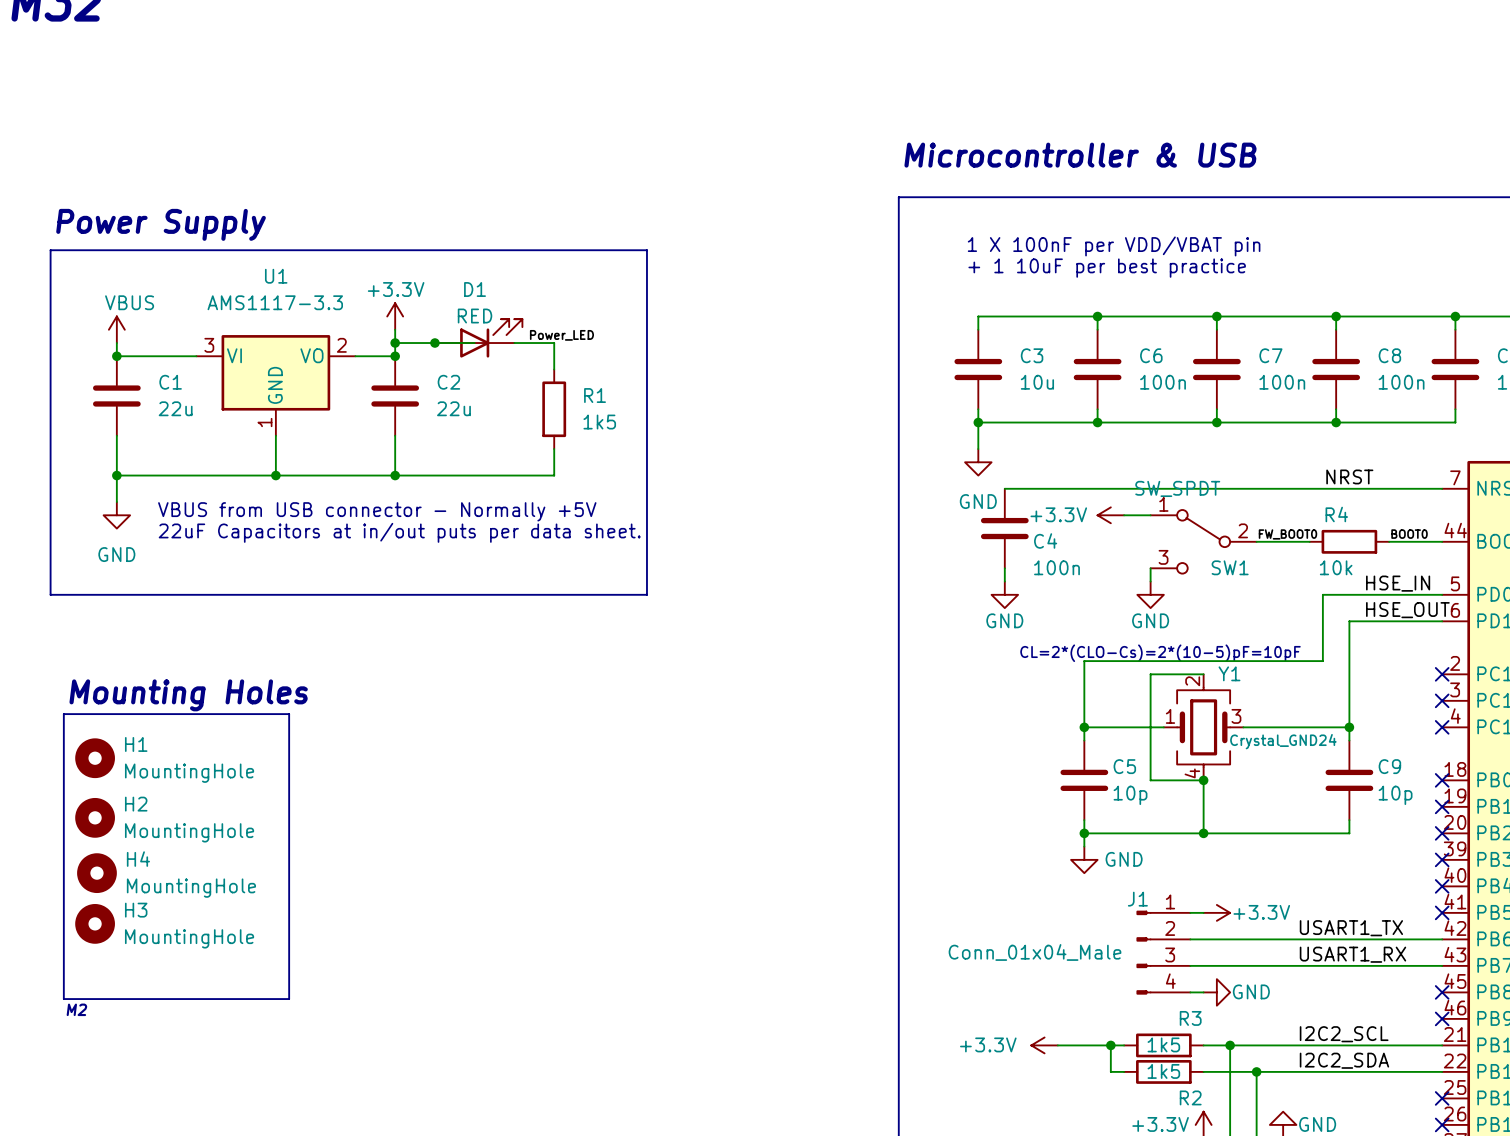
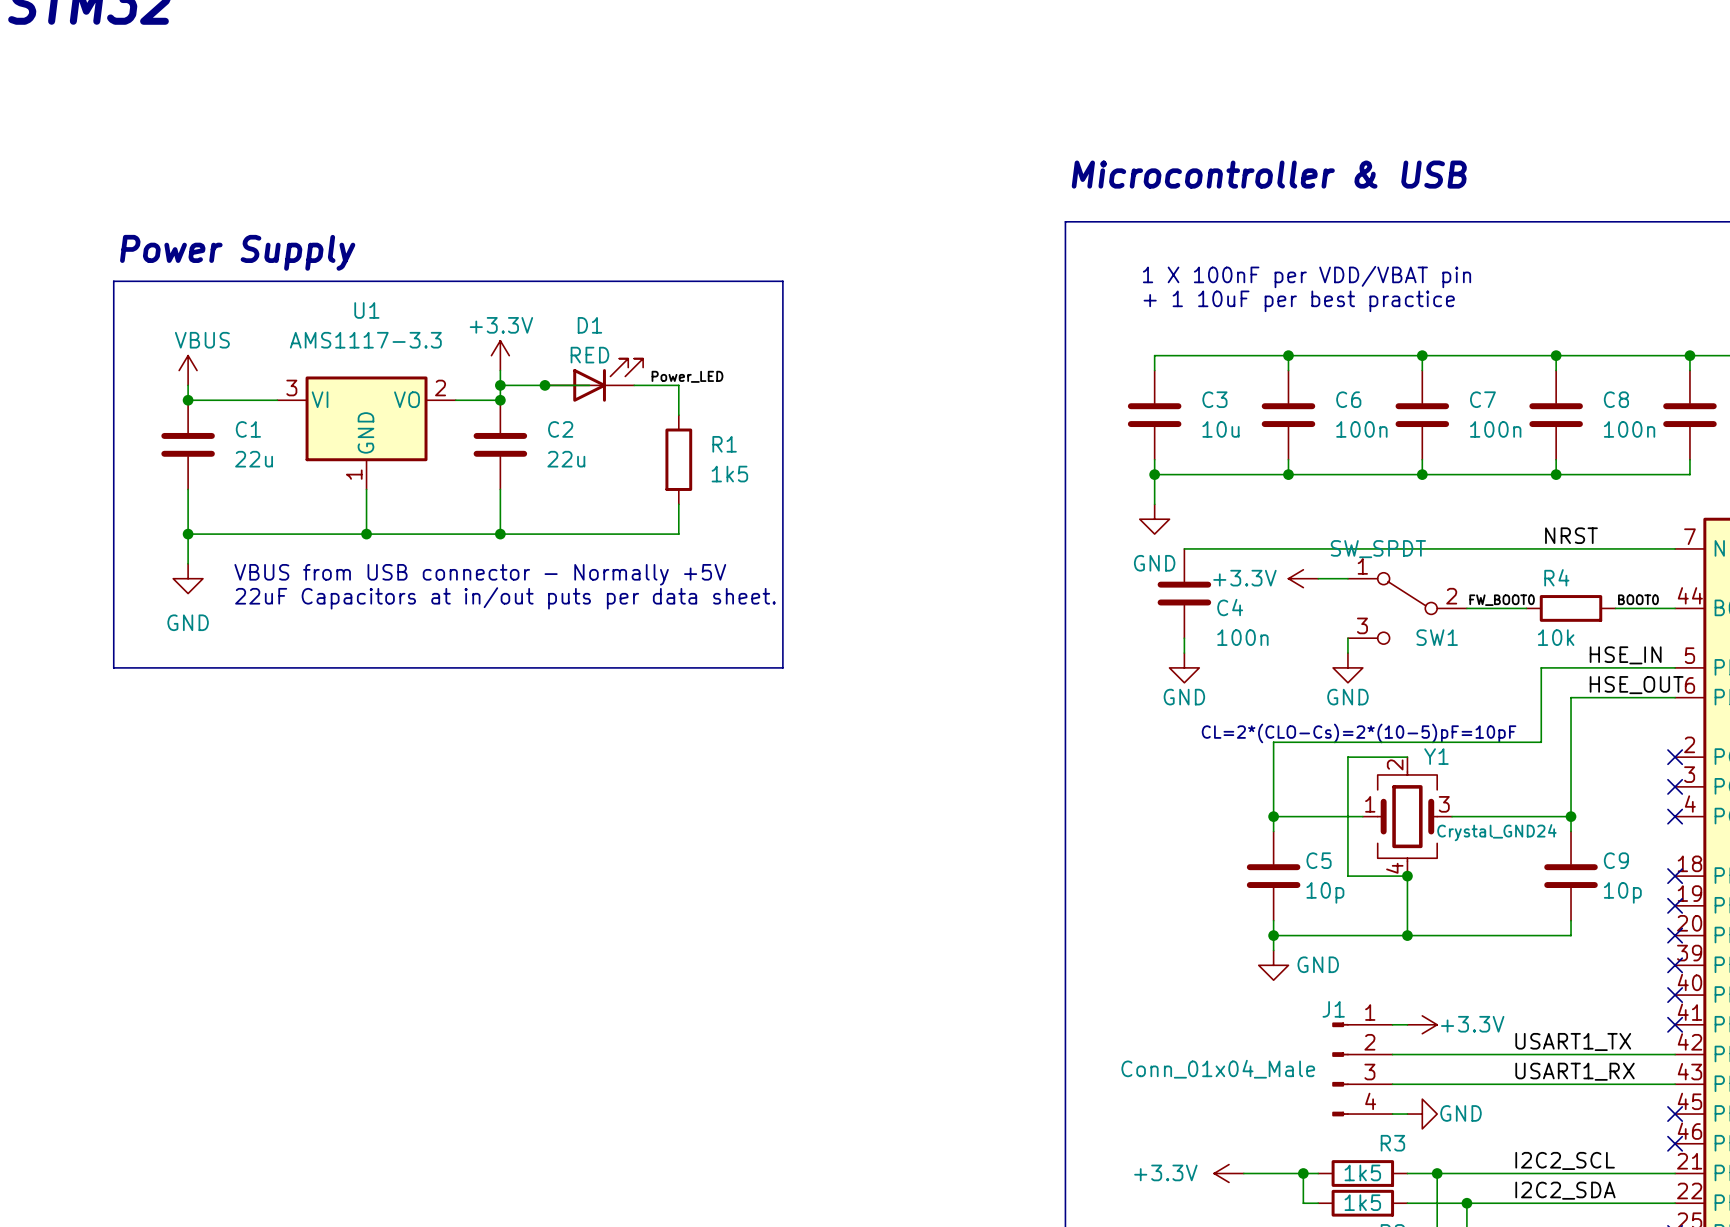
text: Mounting Holes (188, 695) -> none
line: (63, 714) (63, 999) (289, 999) (289, 714) (63, 714) -> none
H1: MountingHole (95, 758) -> none
H2: MountingHole (95, 817) -> none
H4: MountingHole (96, 873) -> none
H3: MountingHole (95, 923) -> none
text: M2 (76, 1009) -> none

